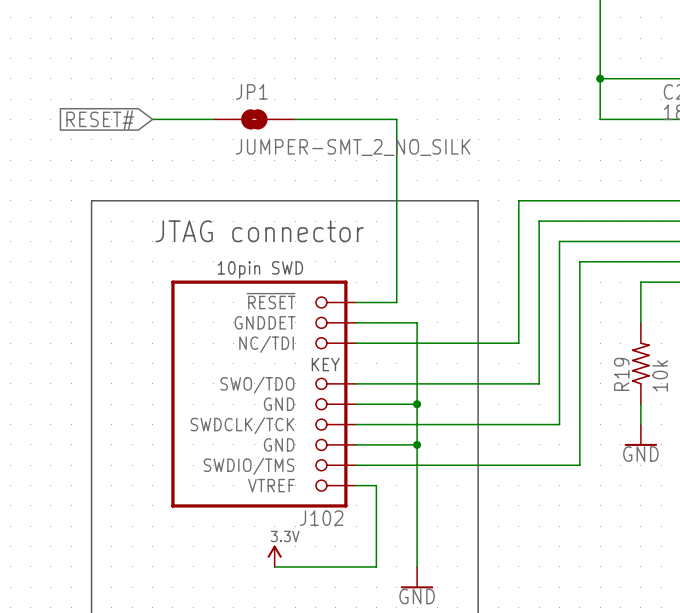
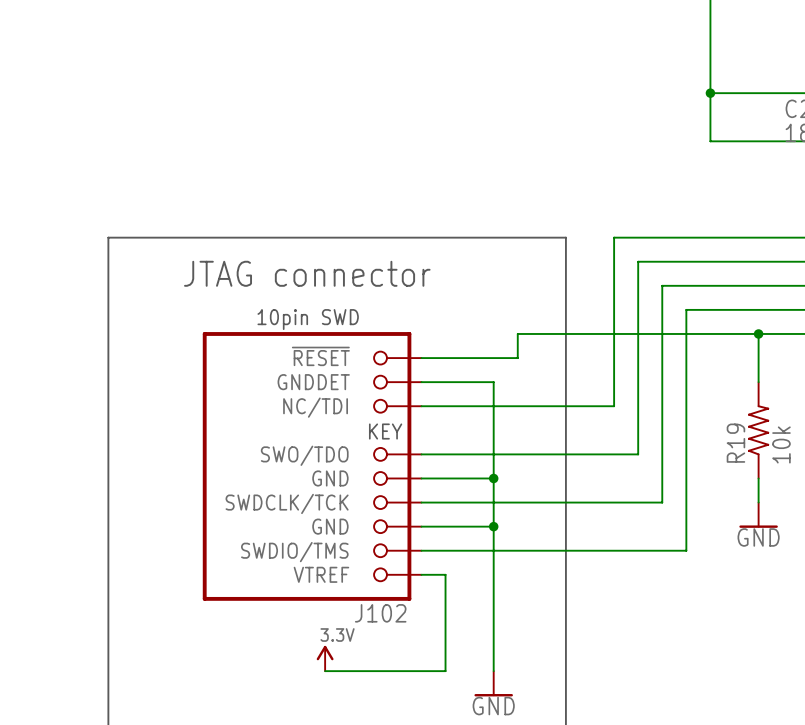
wire: (152, 119) (213, 119) -> none
JP1: JUMPER-SMT_2_NO_SILK (254, 119) -> none
wire: (295, 119) (396, 119) (396, 302) -> (758, 333) (517, 333) (517, 358) (469, 358)
global label: RESET# (100, 120) -> none
junction: none -> (758, 333)

